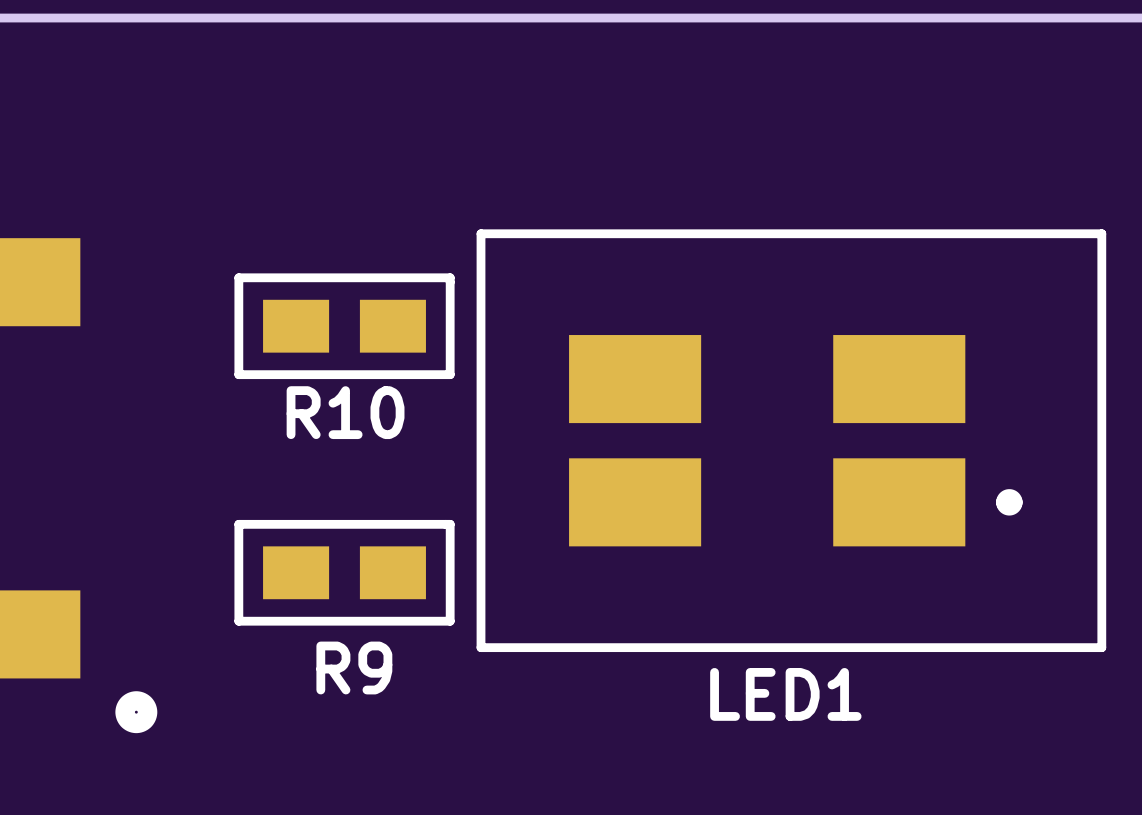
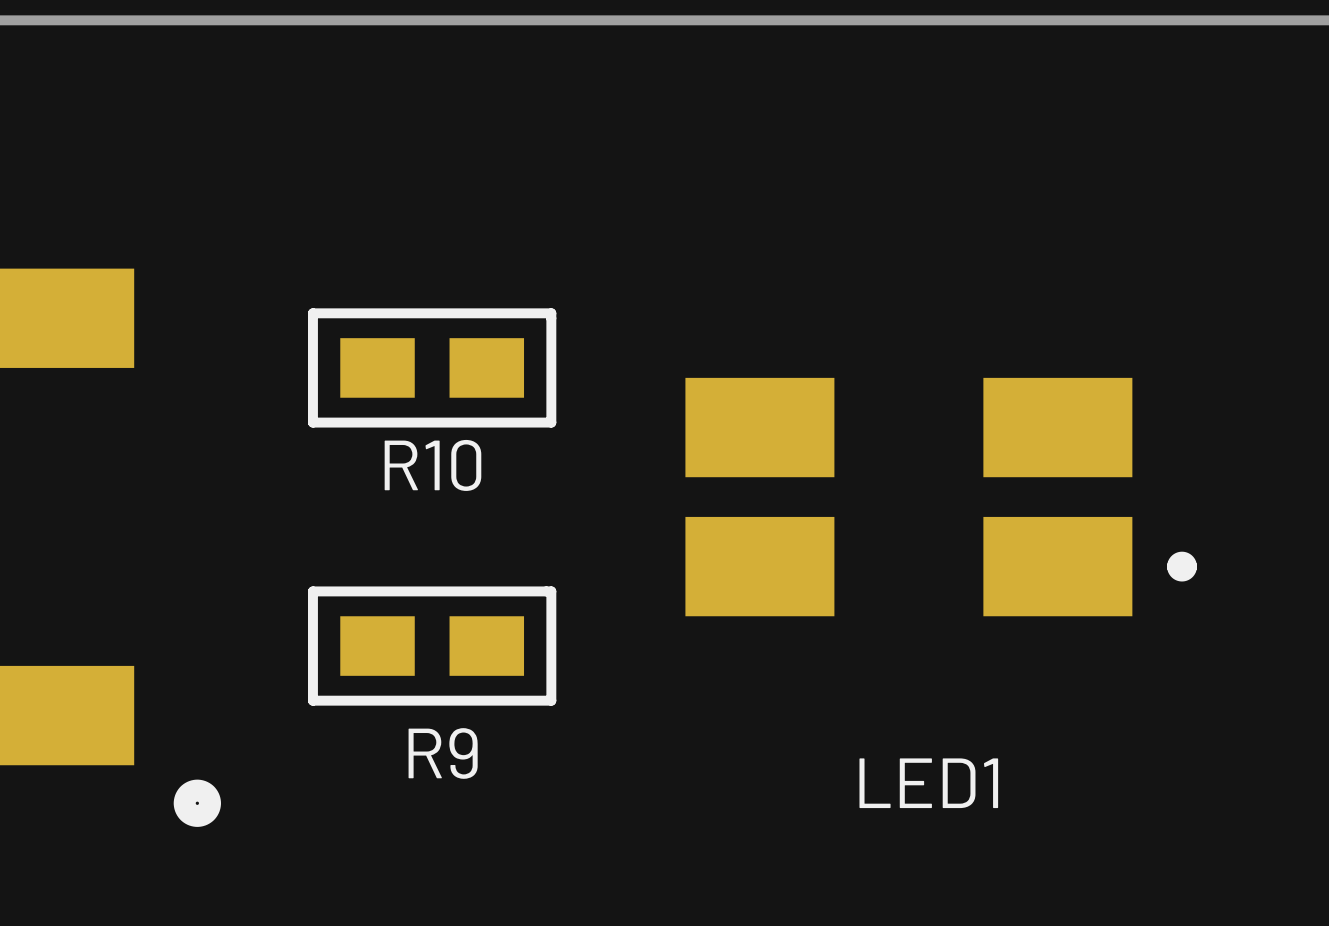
line: (481, 233) (1101, 233) (1101, 647) (481, 647) (481, 233) -> none

